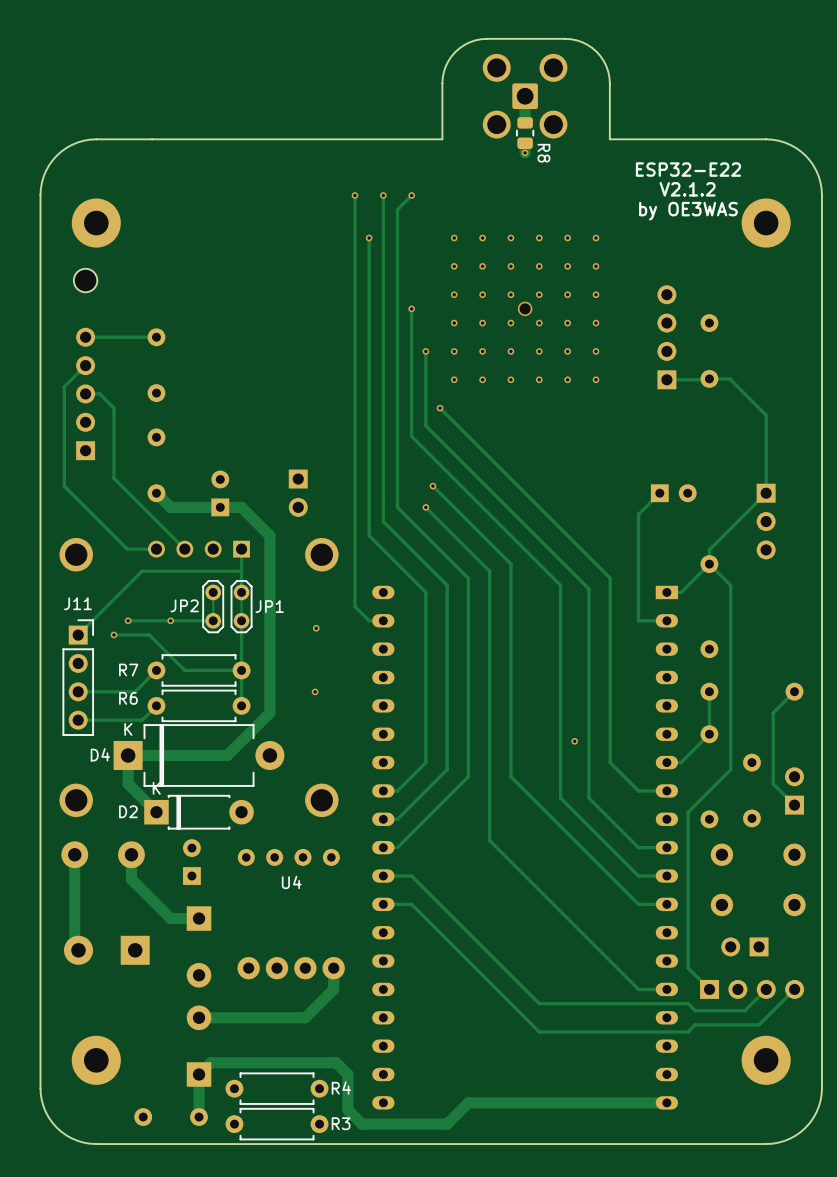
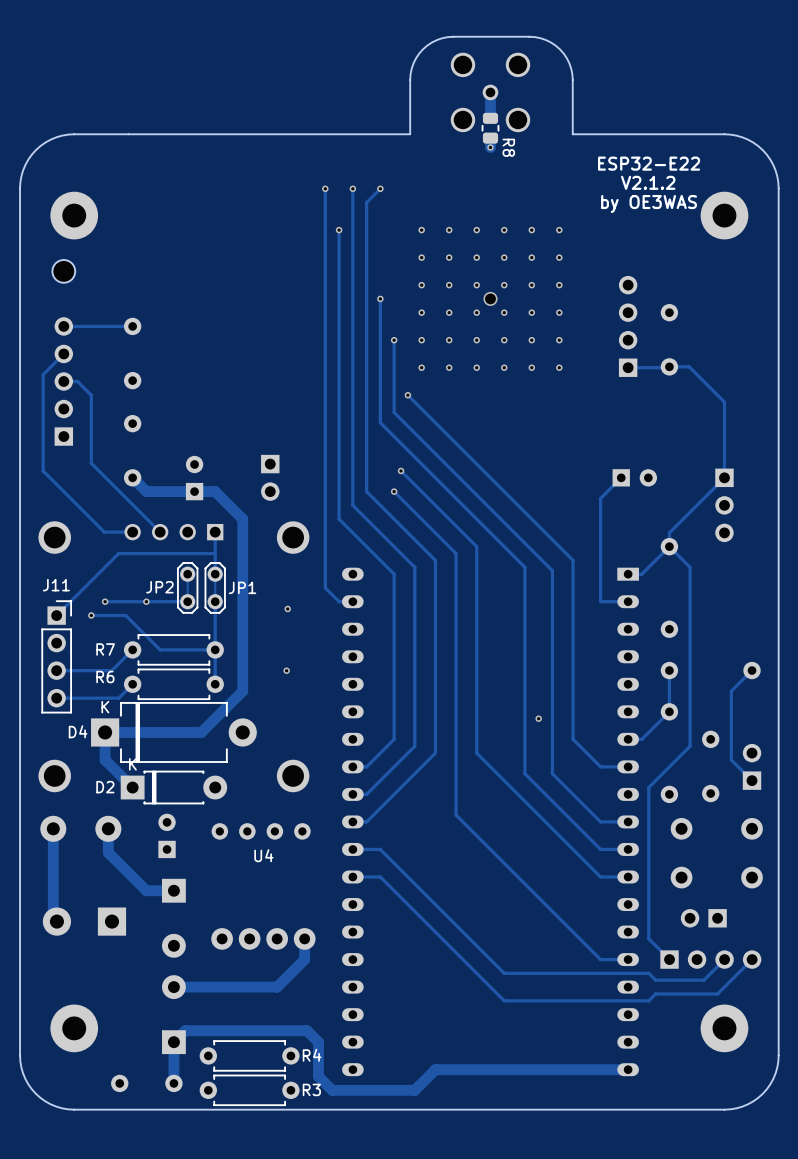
part footprint: [482, 53, 568, 139] -> [450, 52, 531, 133]

